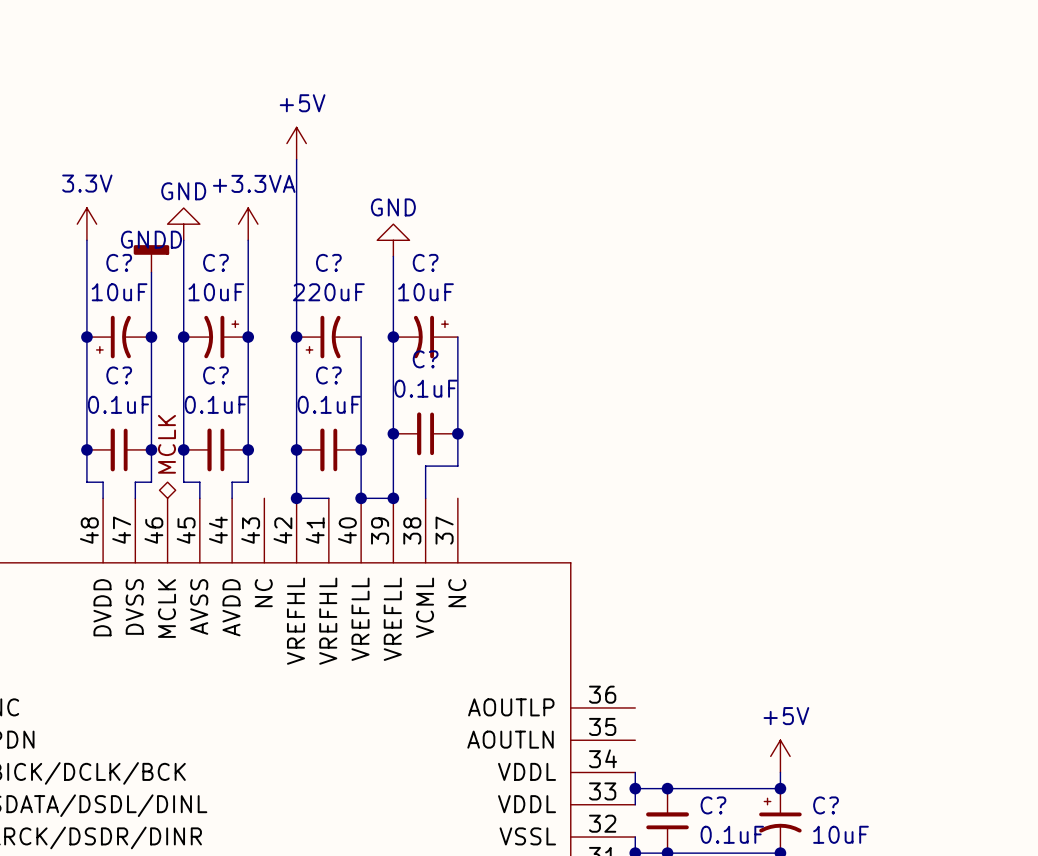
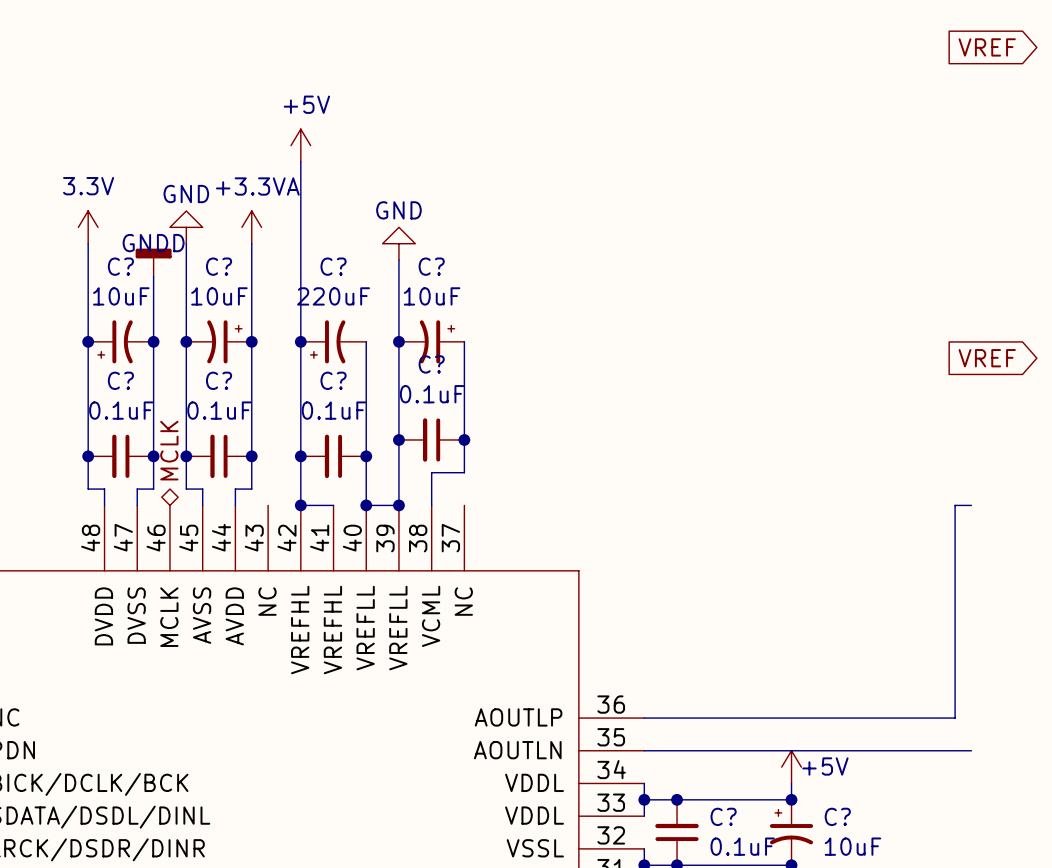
global label: none -> VREF (987, 47)
global label: none -> VREF (987, 358)
wire: none -> (971, 505) (955, 505) (955, 718) (644, 718)
power symbol text position: +5V (786, 716) -> +5V (825, 766)
wire: none -> (644, 750) (971, 750)

